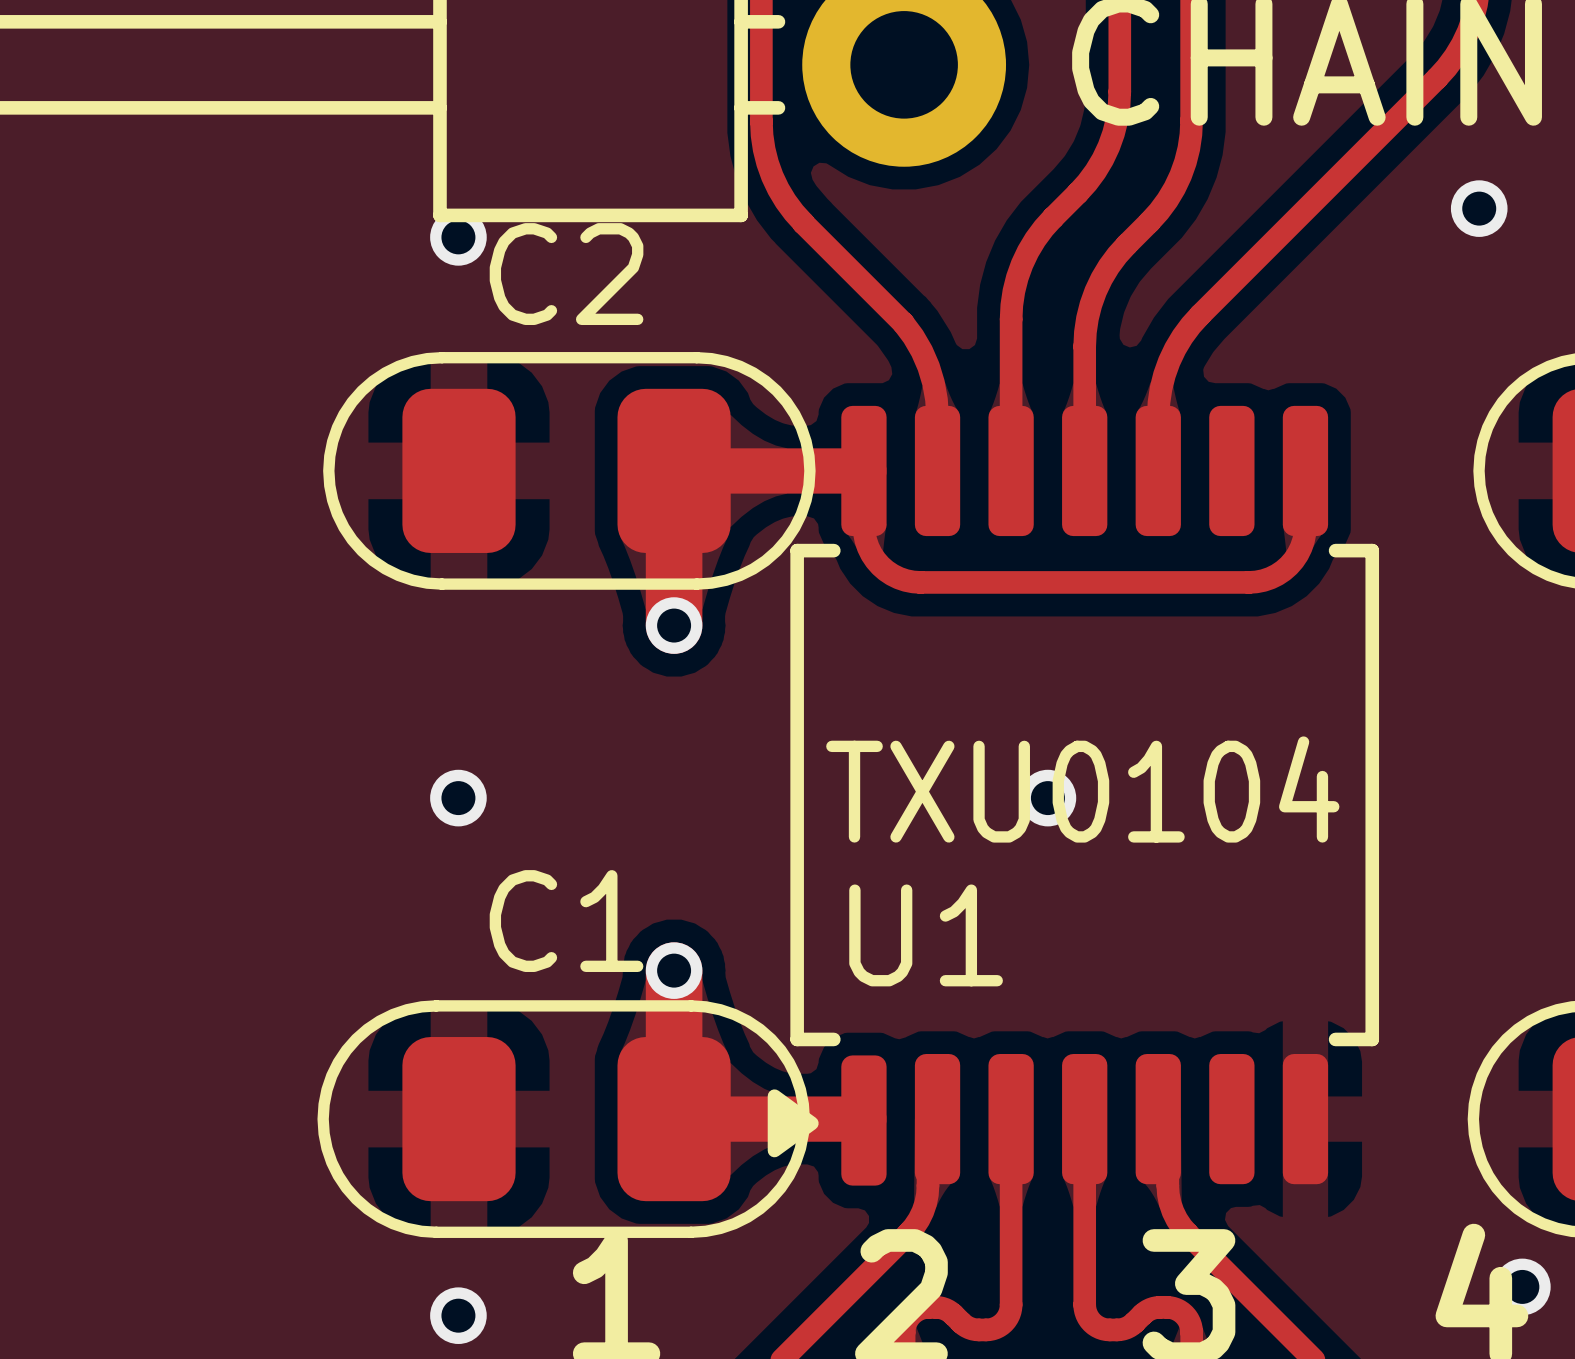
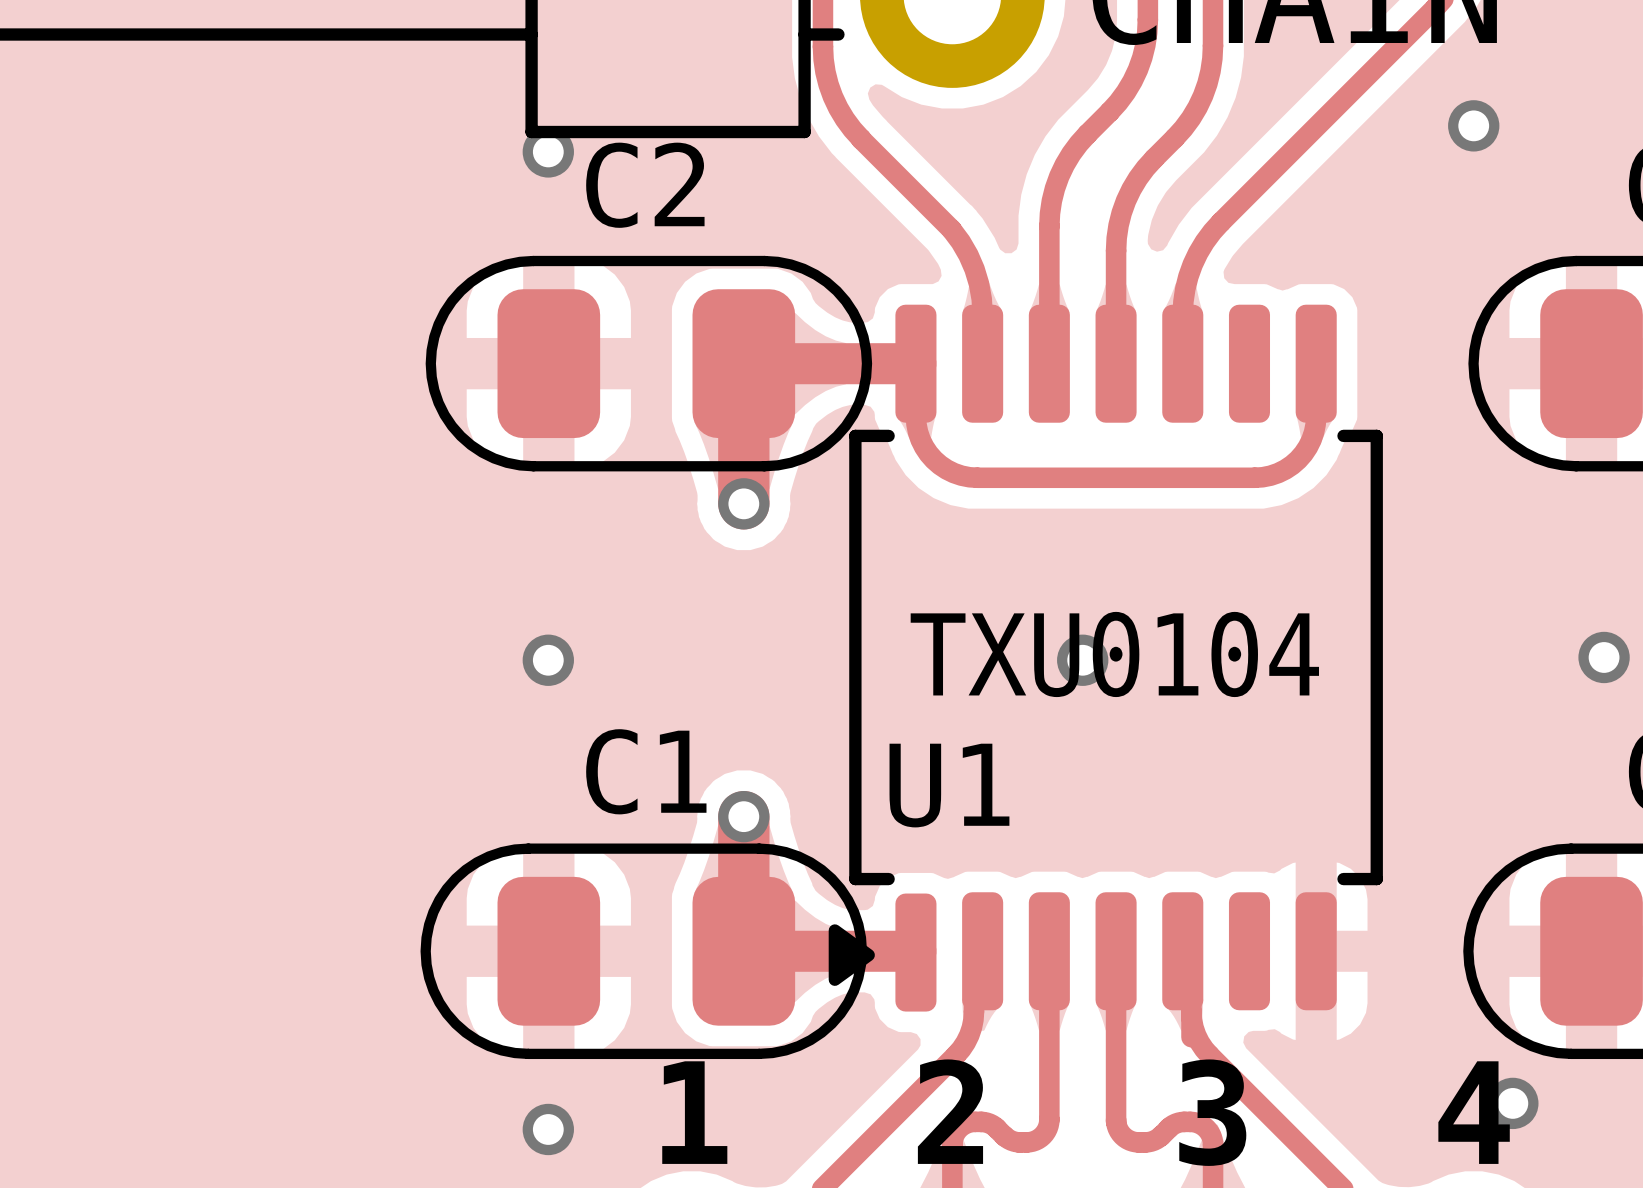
track: (863, 525) (868, 547) (880, 565) (898, 578) (920, 582) (1256, 581) (1277, 574) (1293, 560) (1303, 540) (1305, 525) -> (915, 413) (920, 439) (933, 459) (953, 473) (977, 477) (1262, 477) (1285, 469) (1303, 453) (1314, 432) (1316, 413)

